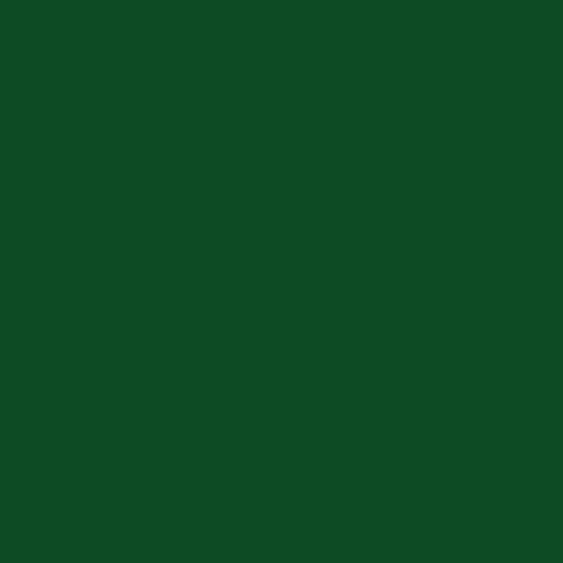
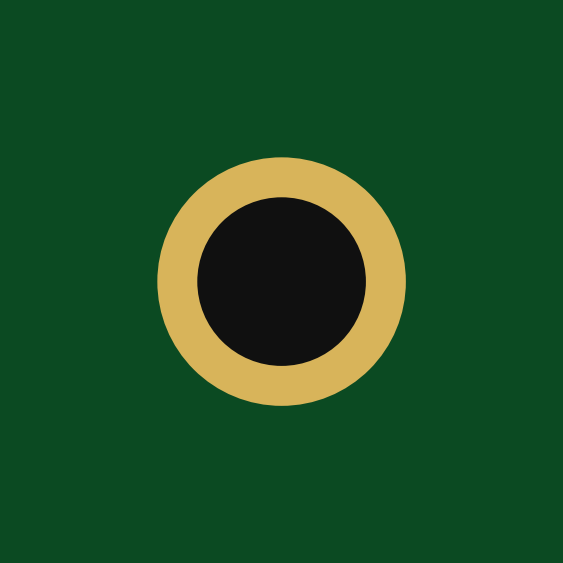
part: none -> (281, 281)

